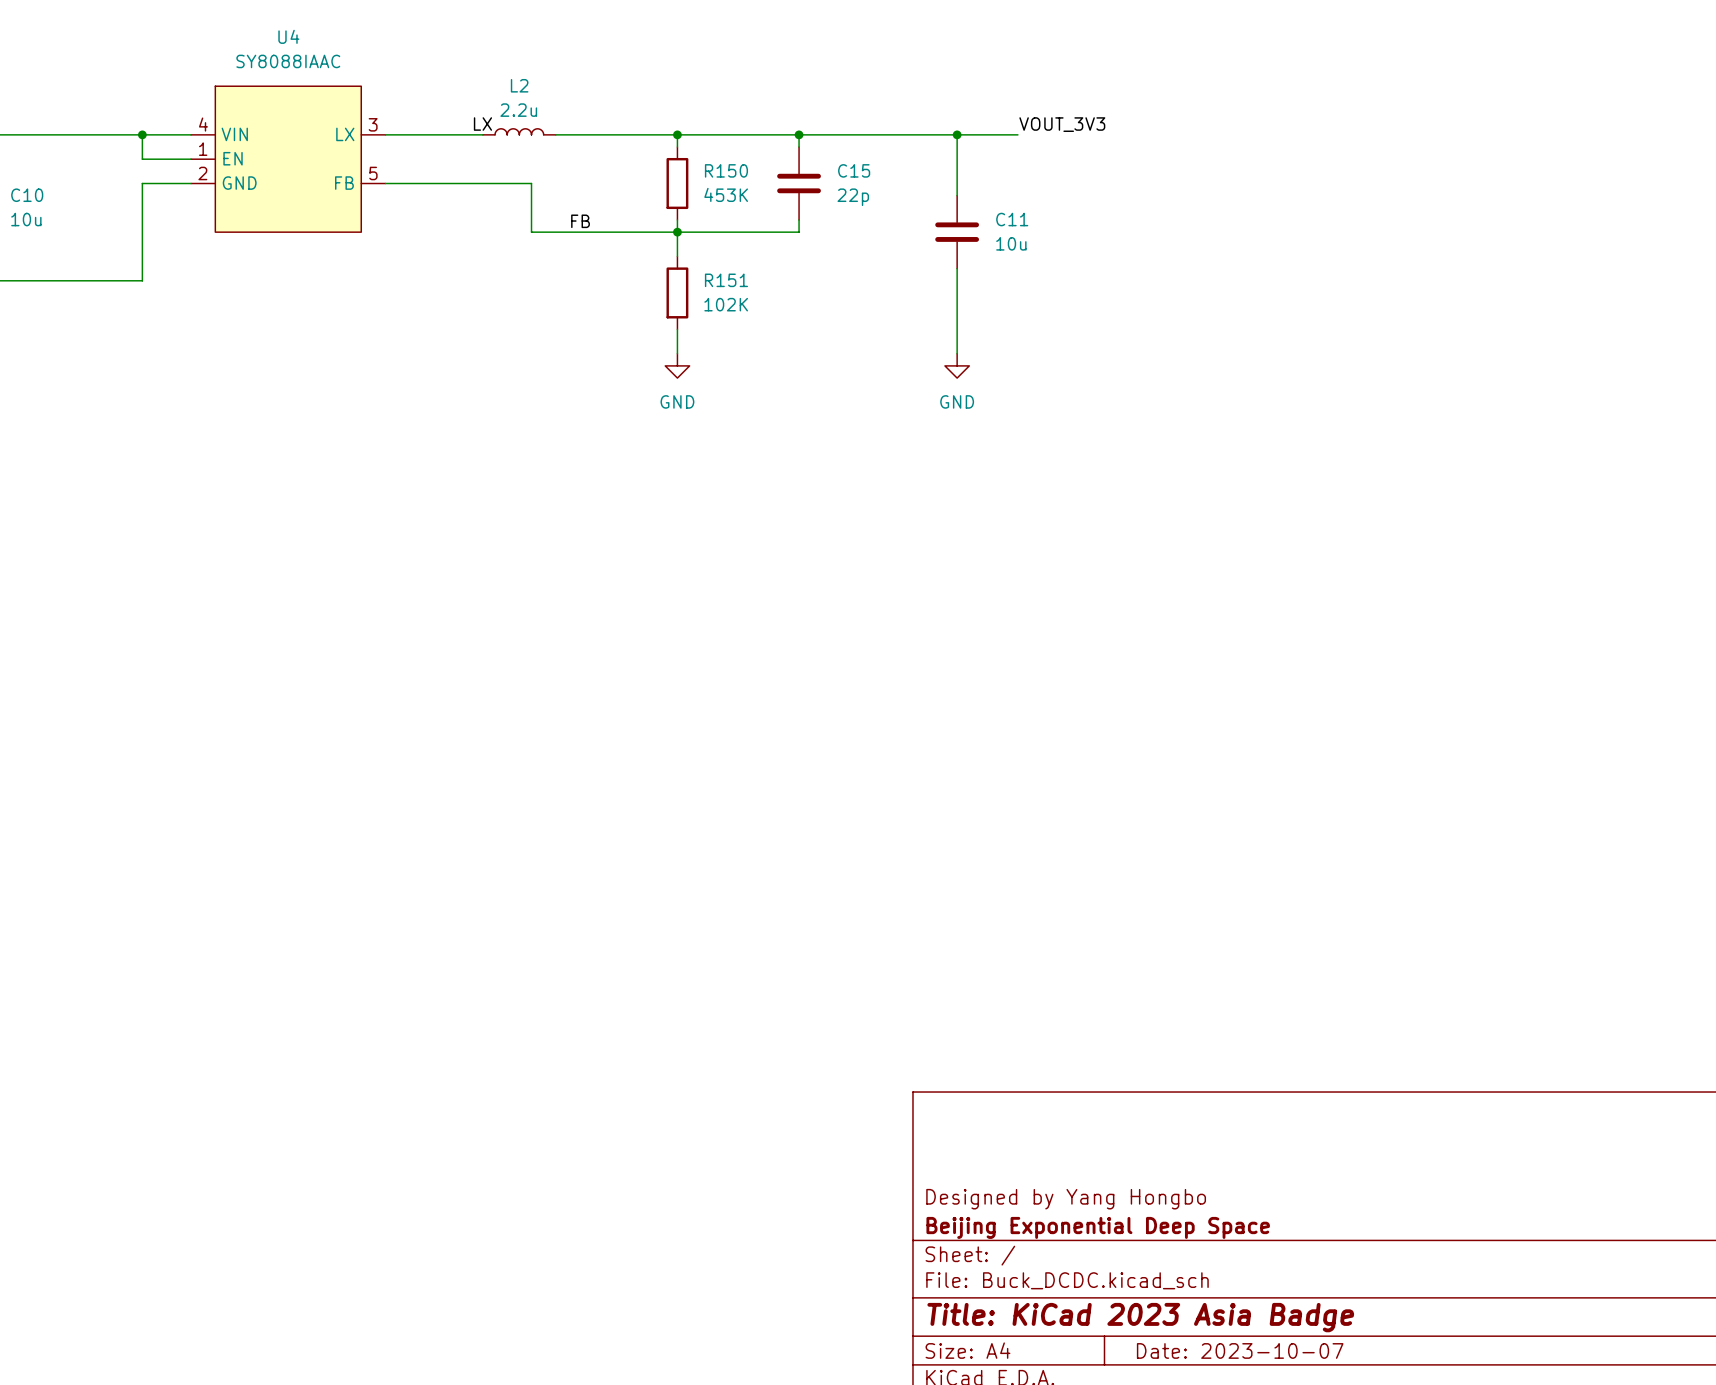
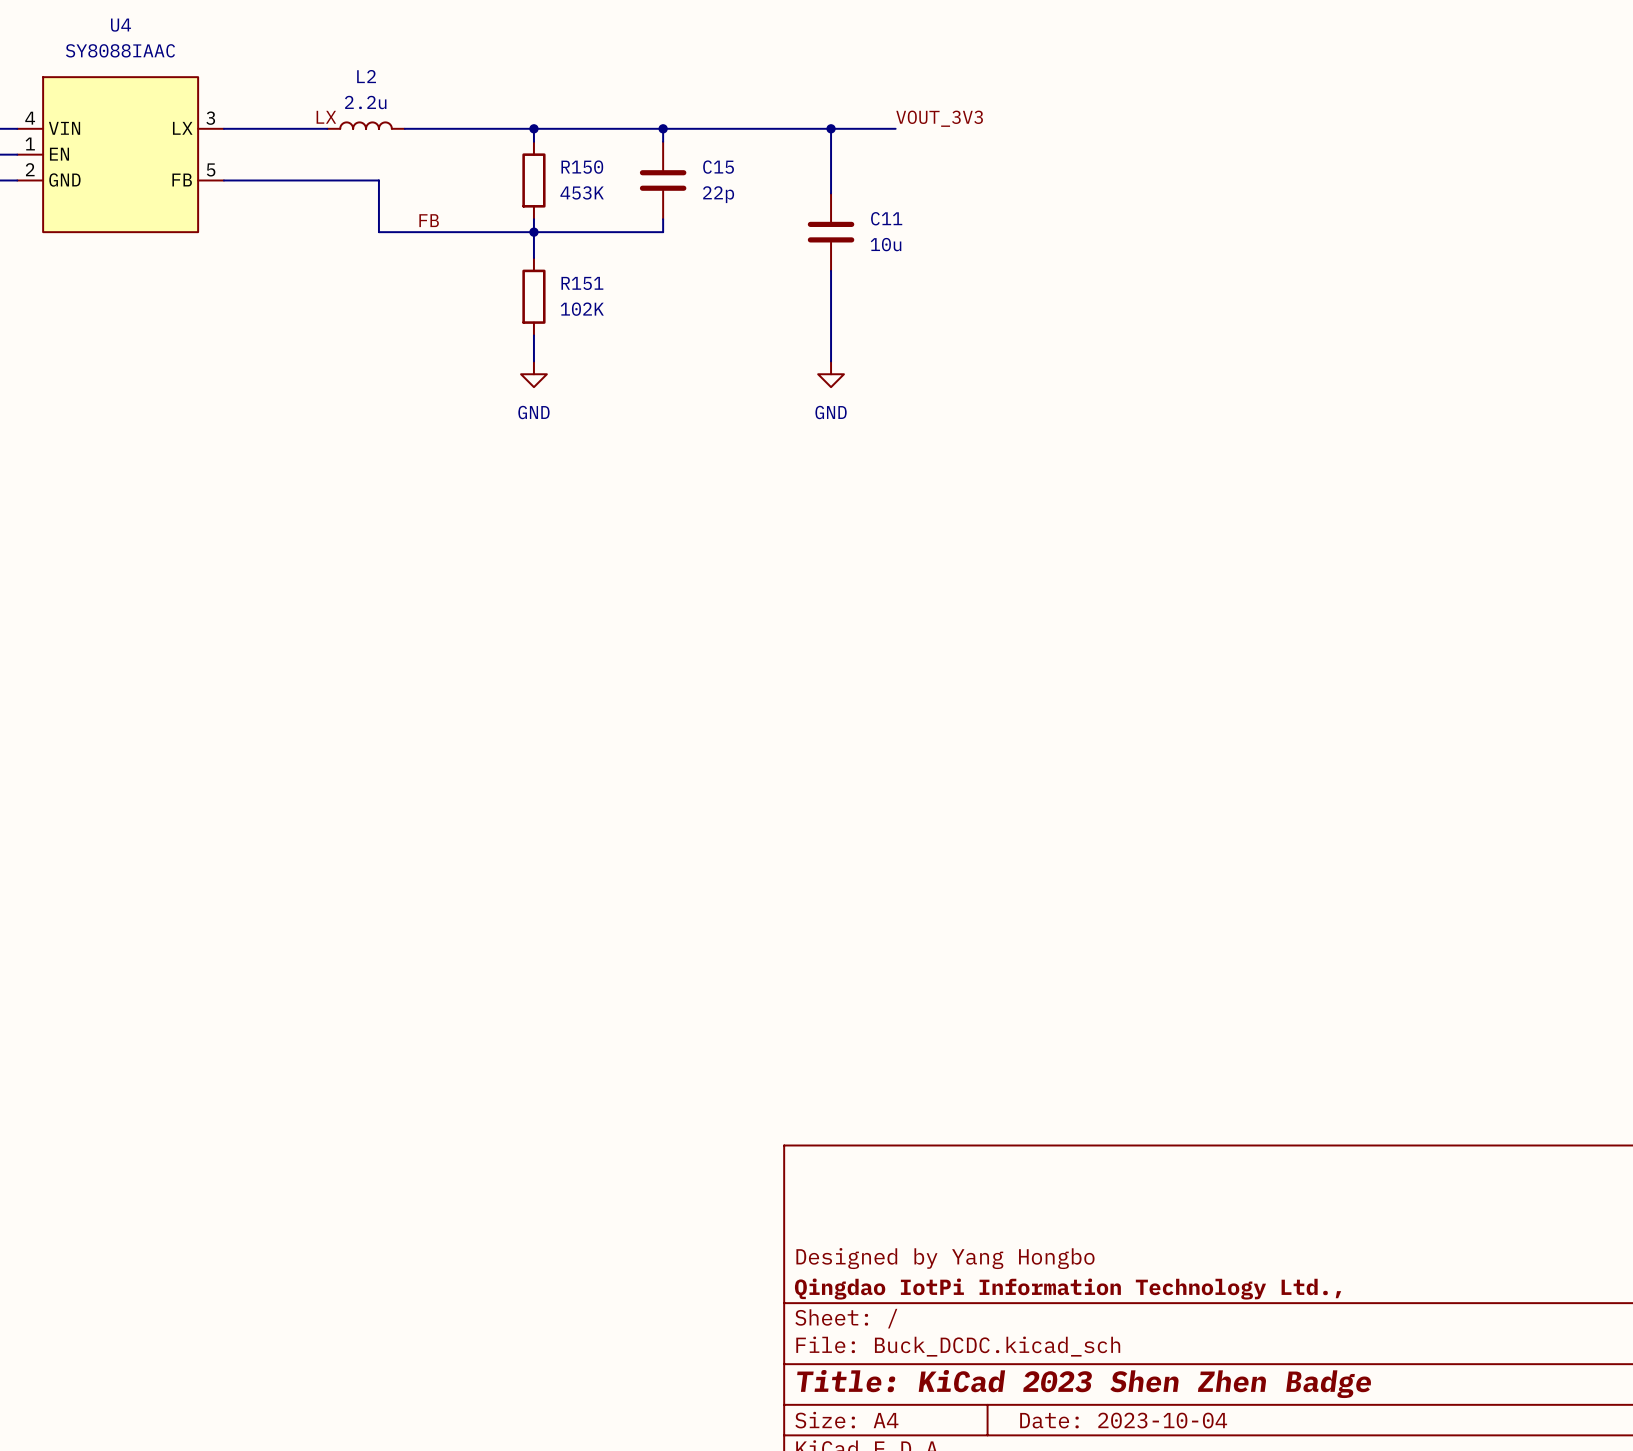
title block: Beijing Exponential Deep Space (1098, 1227) -> Qingdao IotPi Information Technology Ltd., (1068, 1289)
title block: Title: KiCad 2023 Asia Badge (1140, 1317) -> Title: KiCad 2023 Shen Zhen Badge (1084, 1384)
title block: Date: 2023-10-07 (1240, 1350) -> Date: 2023-10-04 (1123, 1420)

